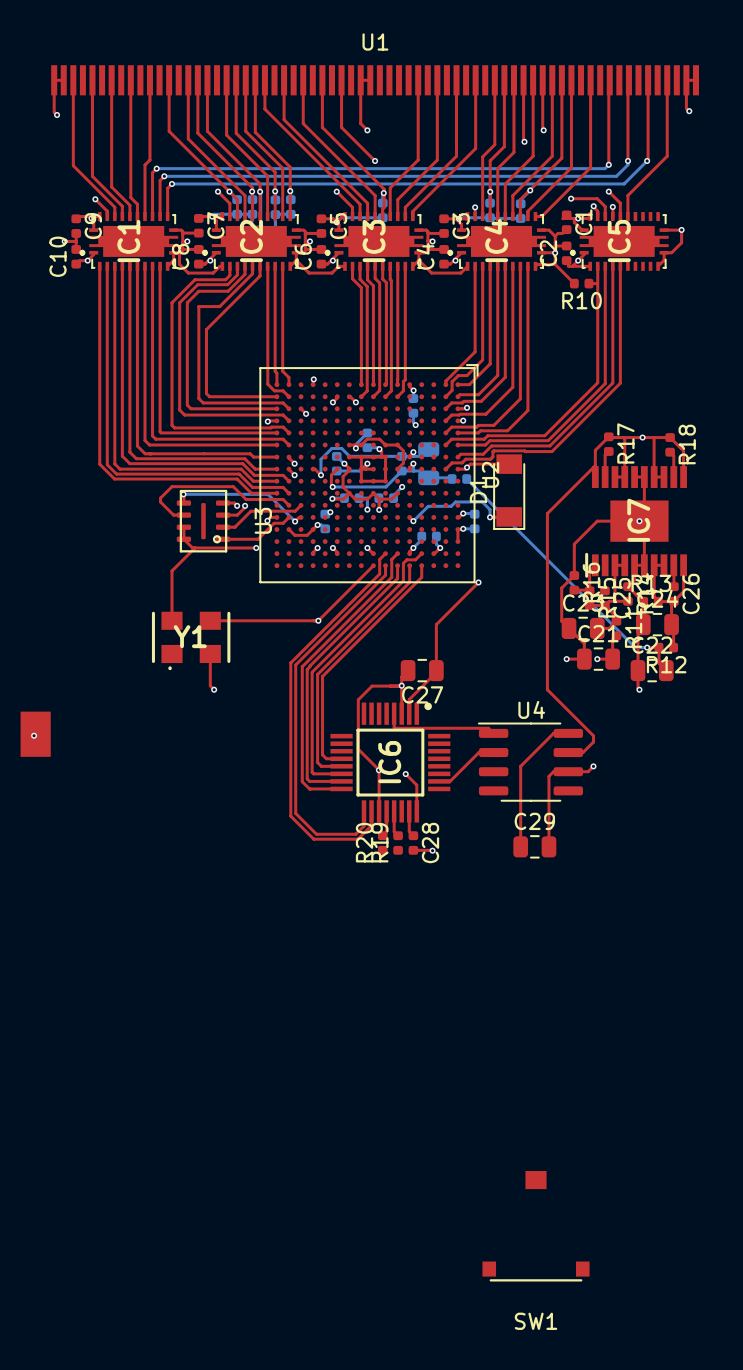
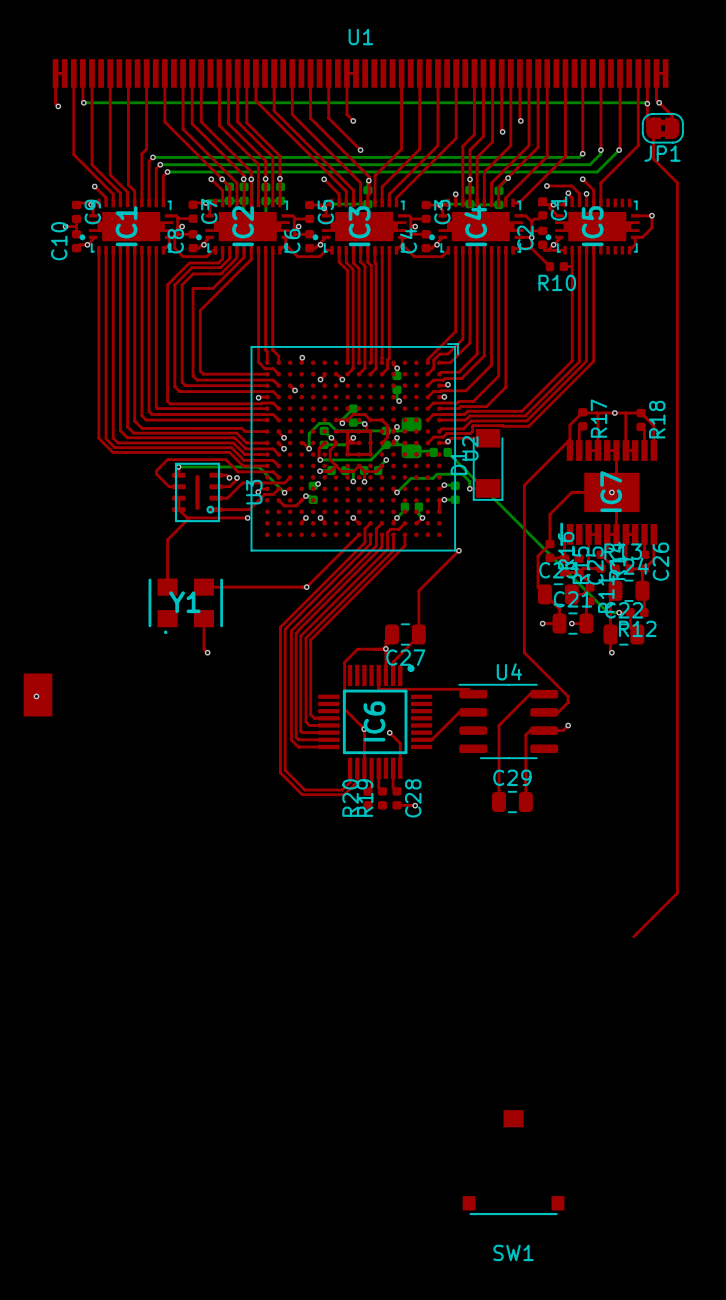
top track: none -> (82, 73) (83, 102)
top track: none -> (647, 73) (647, 122) (653, 128) (653, 159) (677, 182) (677, 893) (633, 936)
bottom track: none -> (83, 102) (647, 103)
via: none -> (83, 102)
top track: none -> (659, 102) (672, 115) (672, 128)
via: none -> (647, 103)
JP1: none -> (662, 128)

